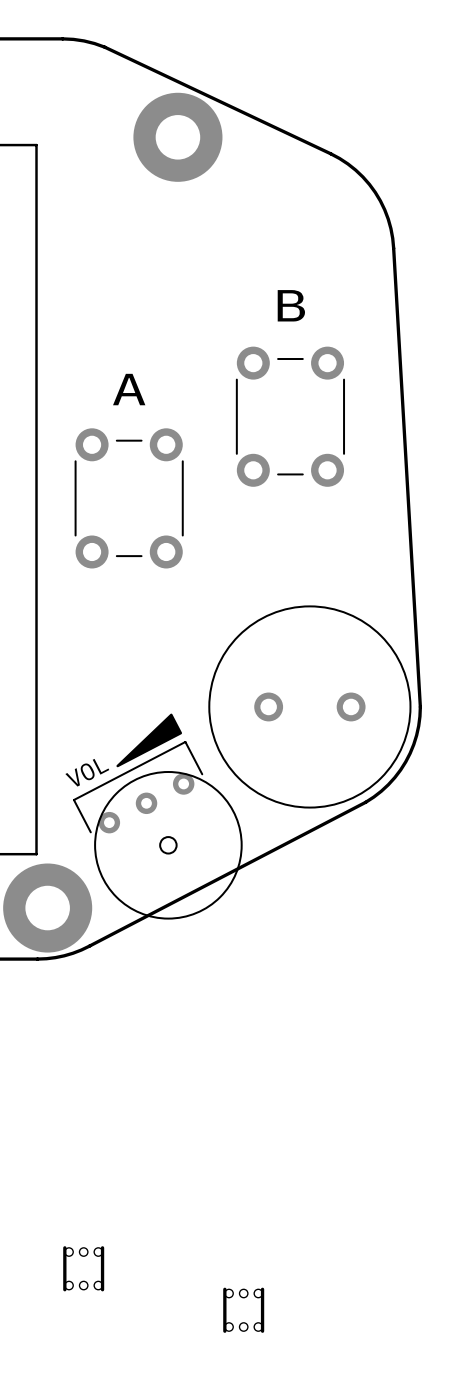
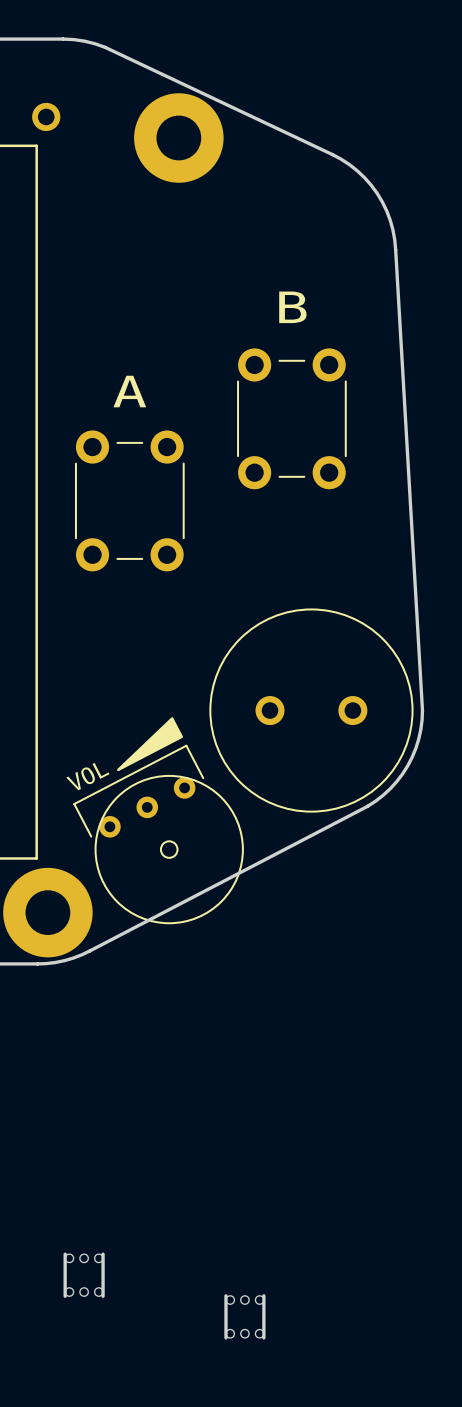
part: none -> (46, 116)

